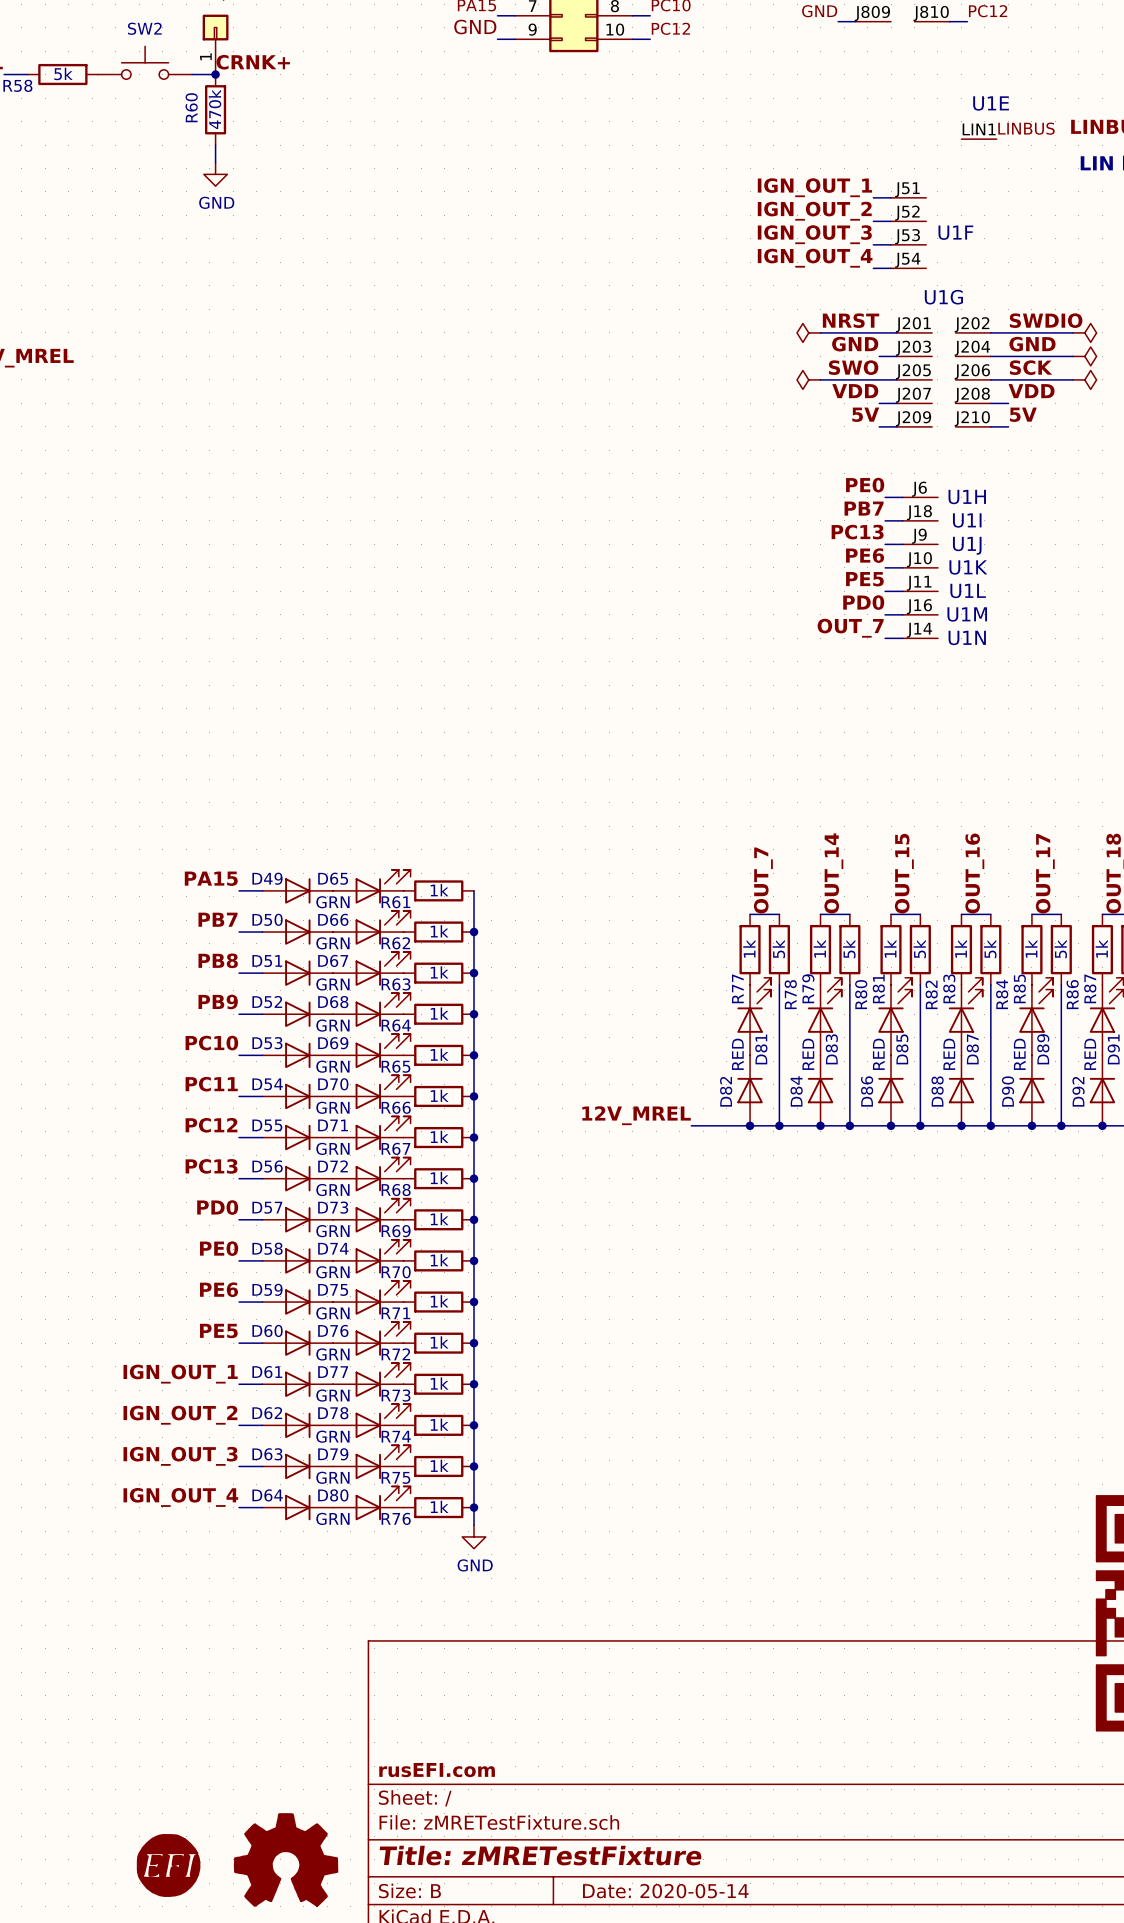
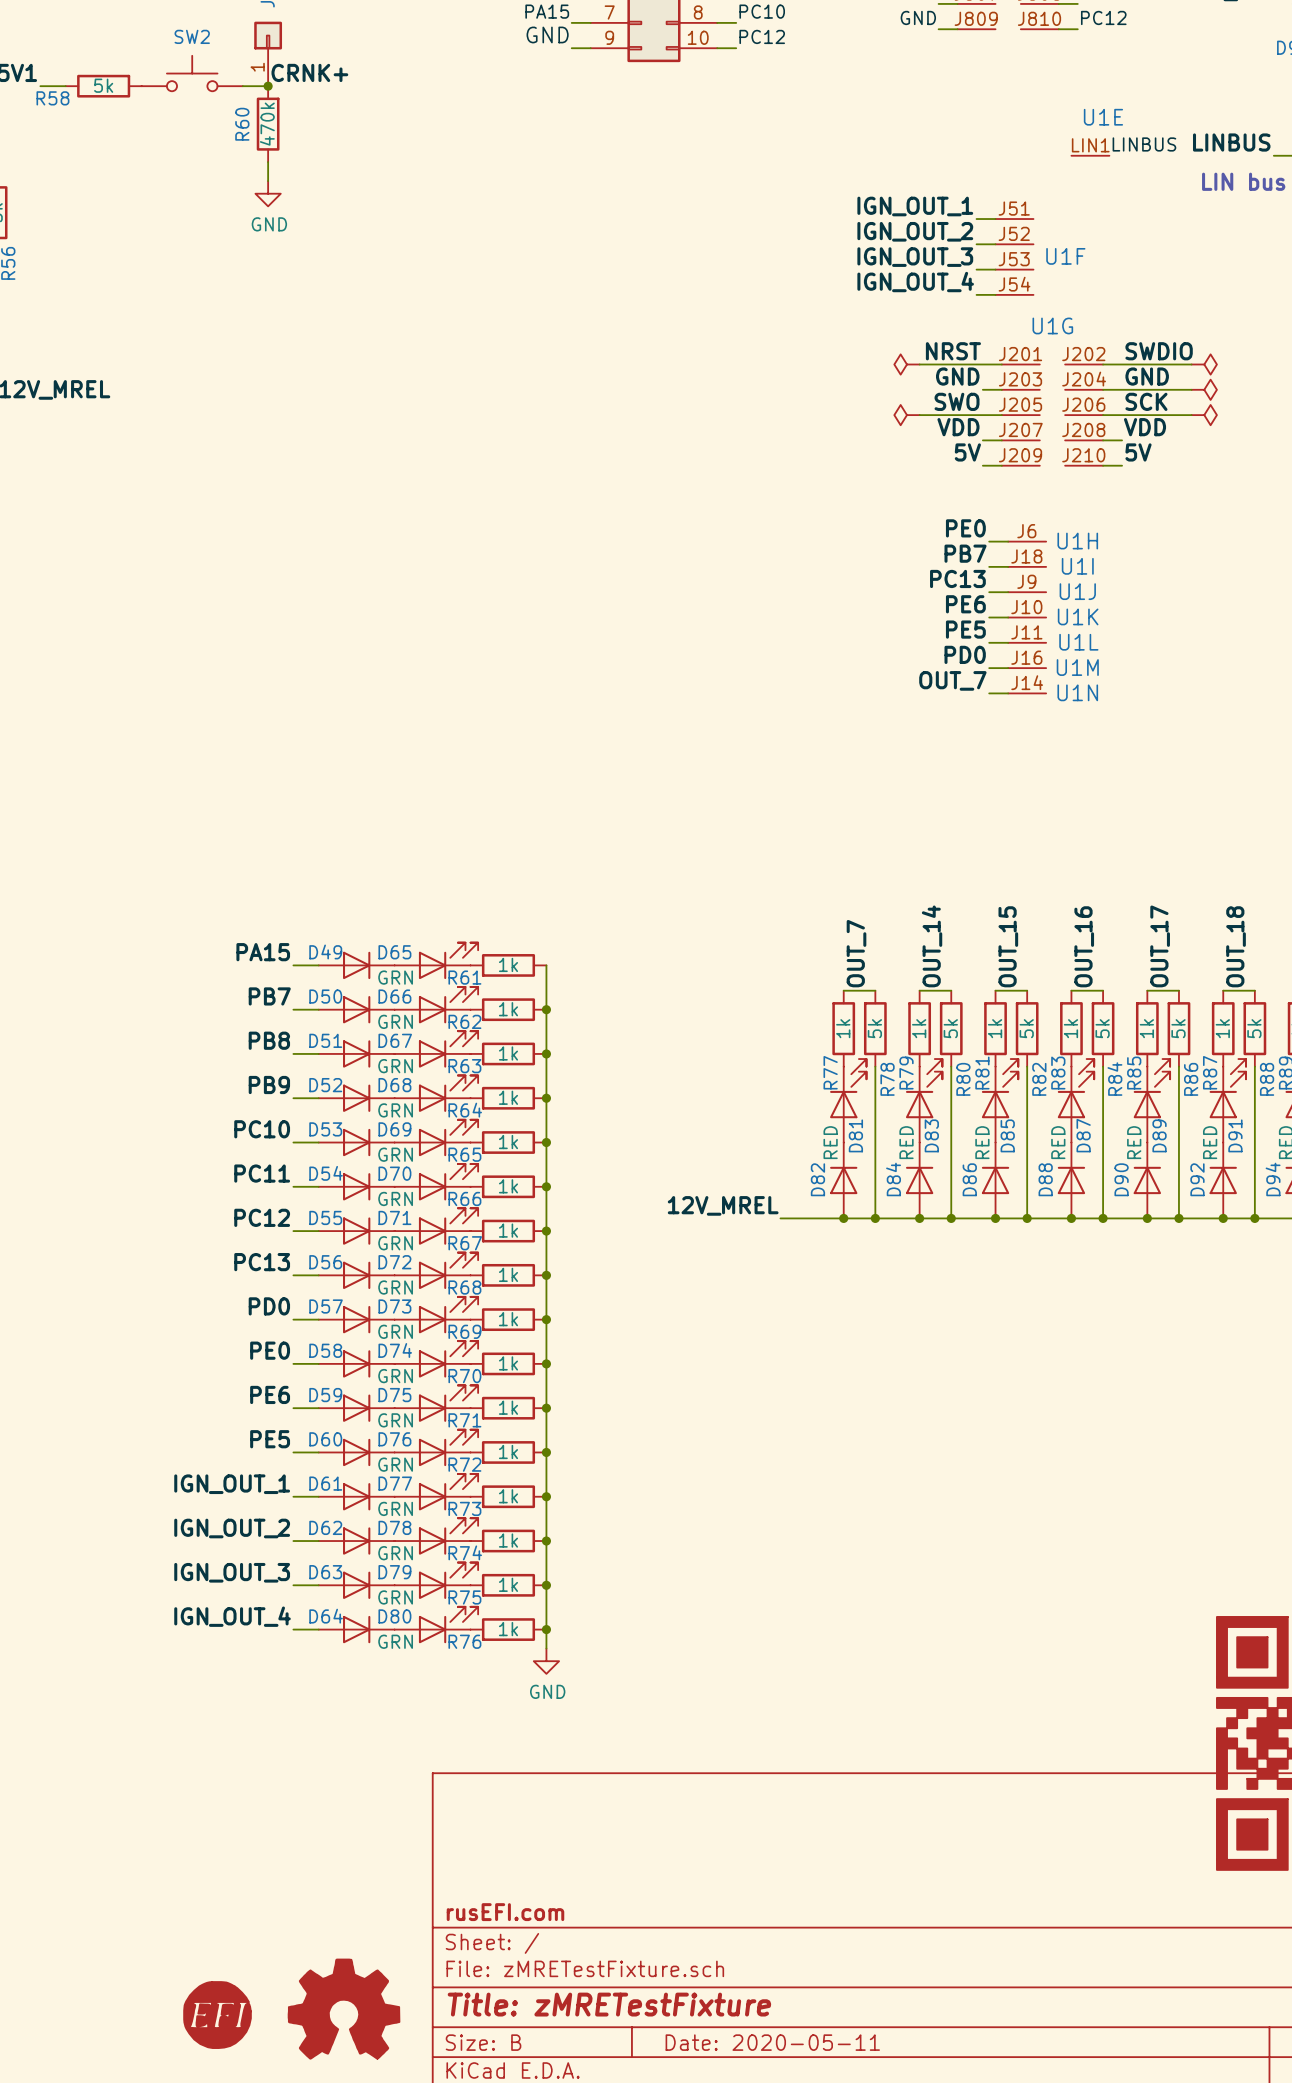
title block: Date: 2020-05-14 (665, 1891) -> Date: 2020-05-11 (772, 2042)

